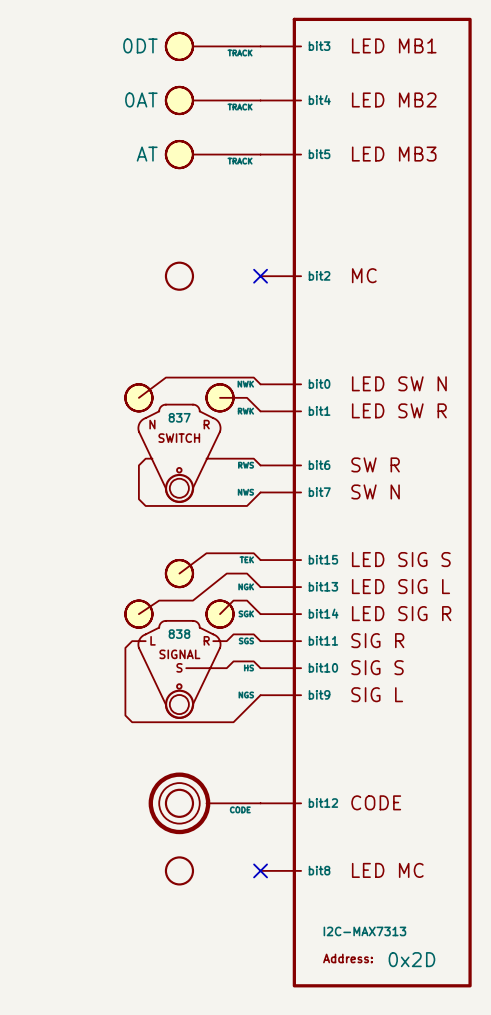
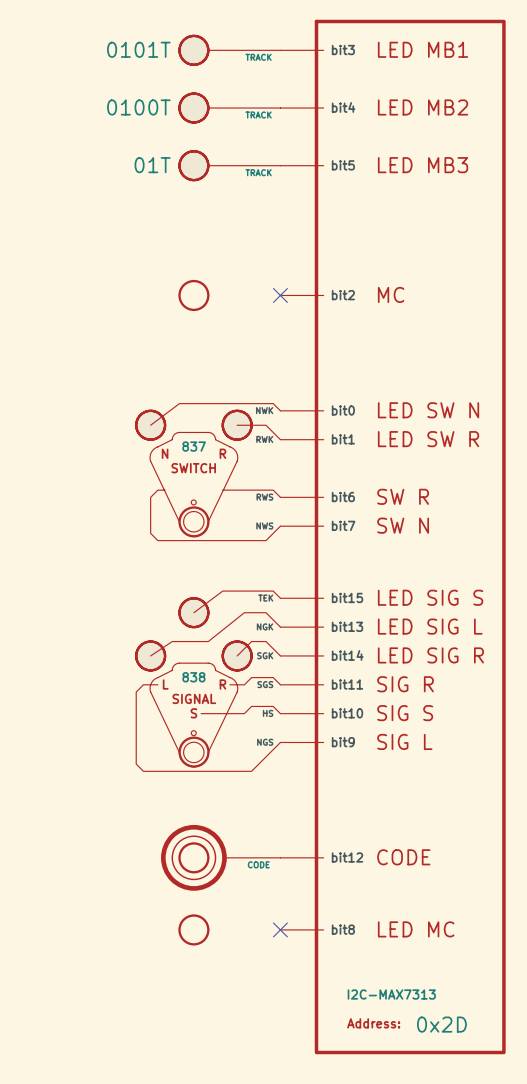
part text: 0DT (140, 45) -> 0101T (138, 49)
part text: 0AT (141, 99) -> 0100T (138, 107)
part text: AT (147, 154) -> 01T (152, 165)

